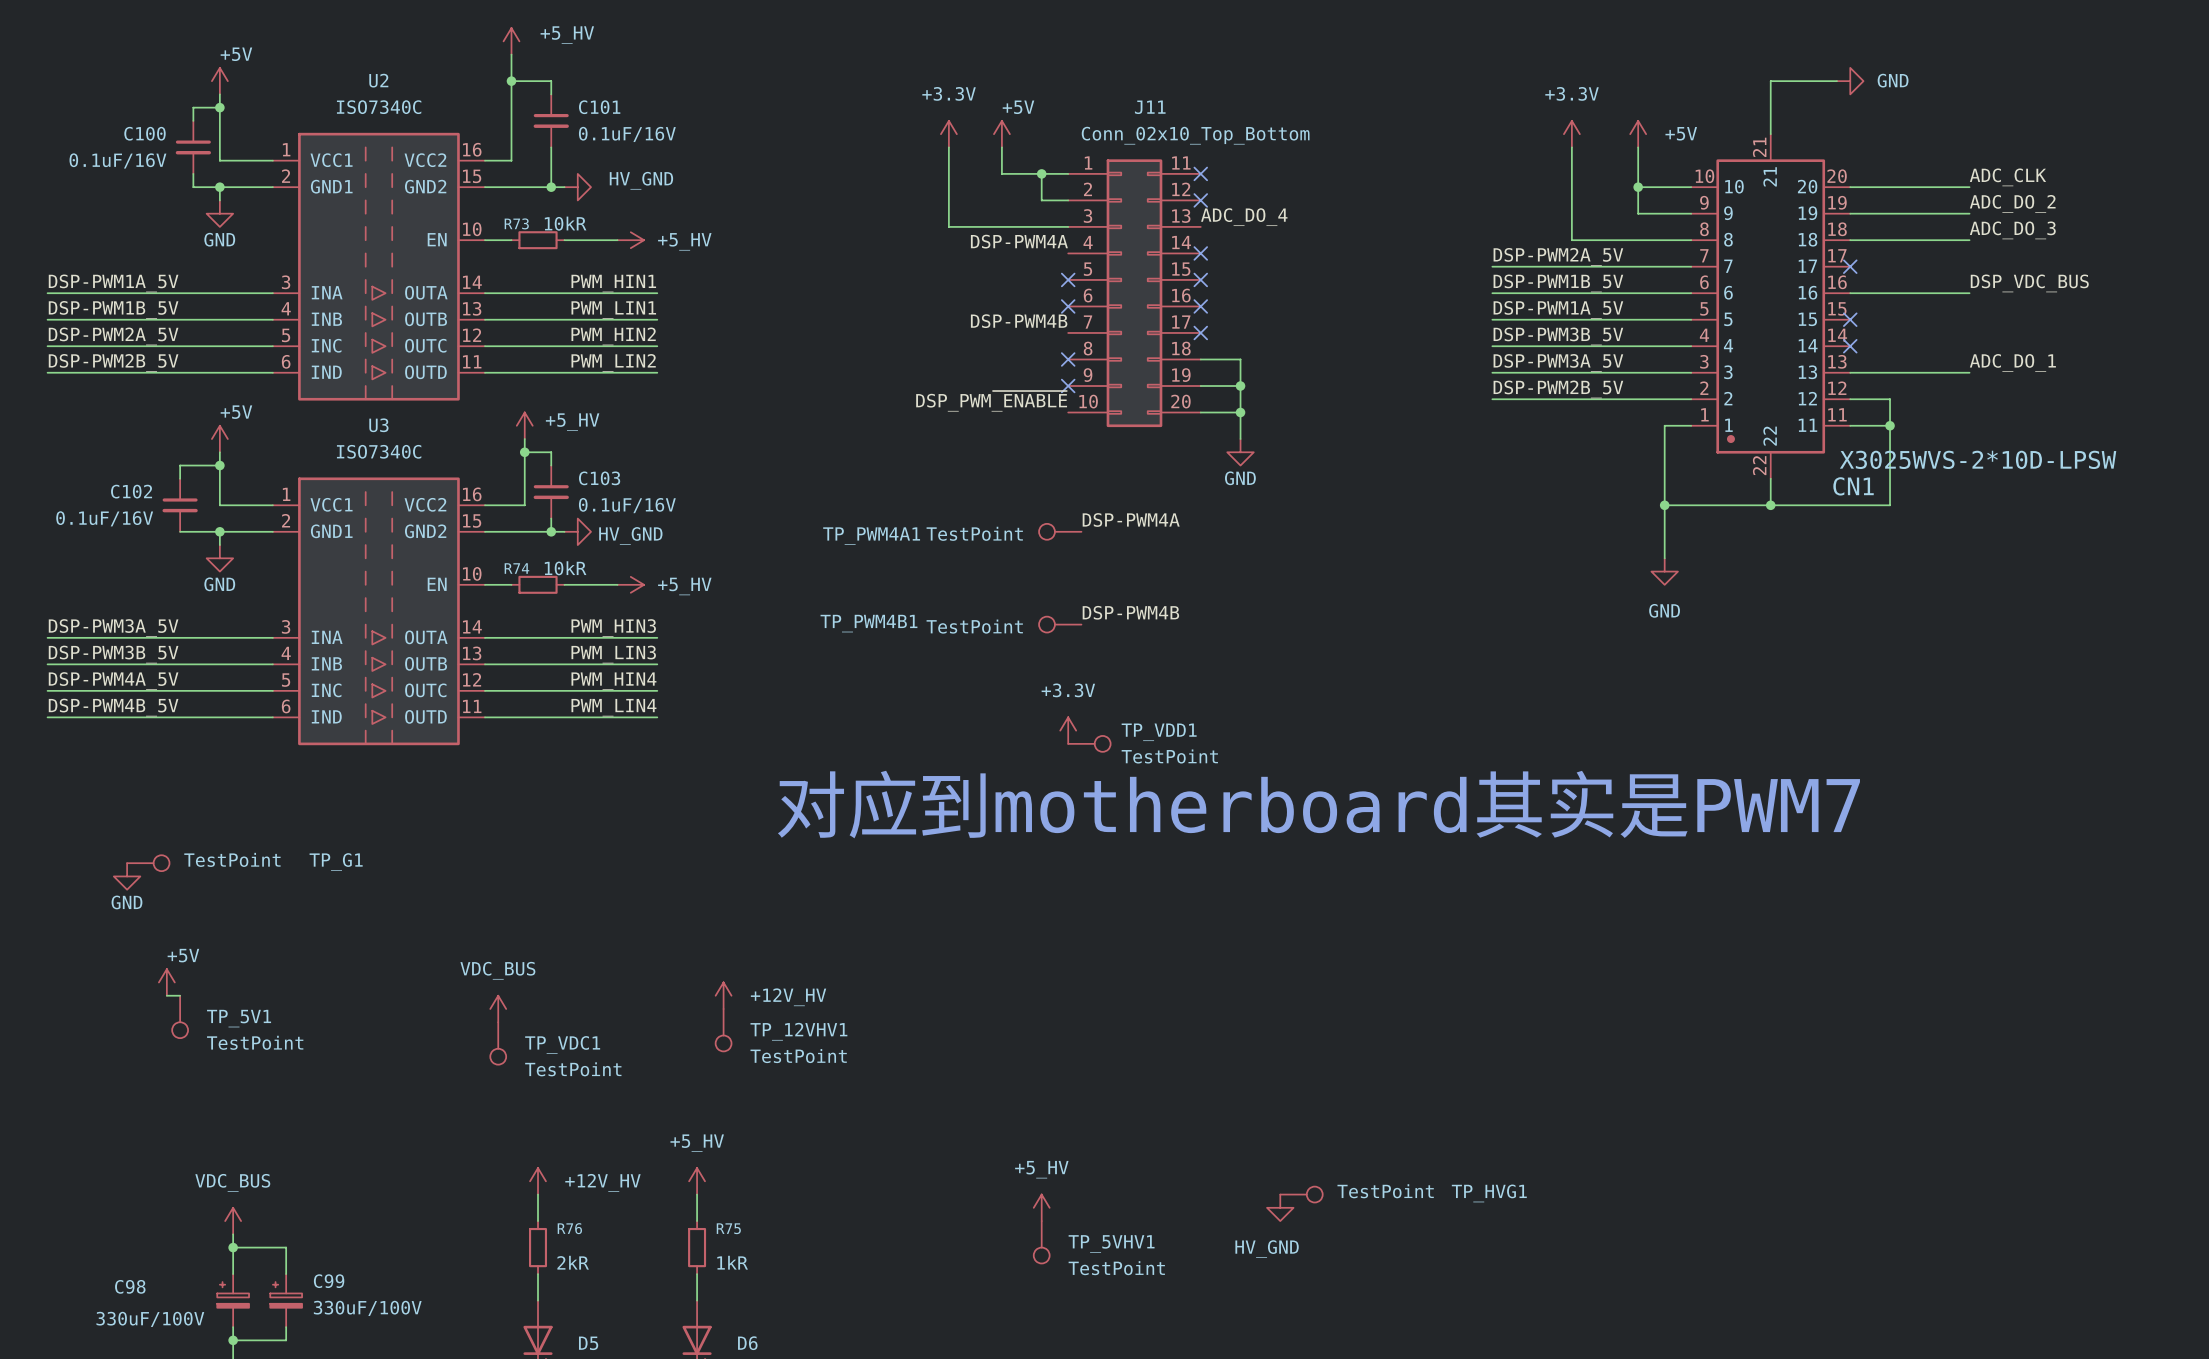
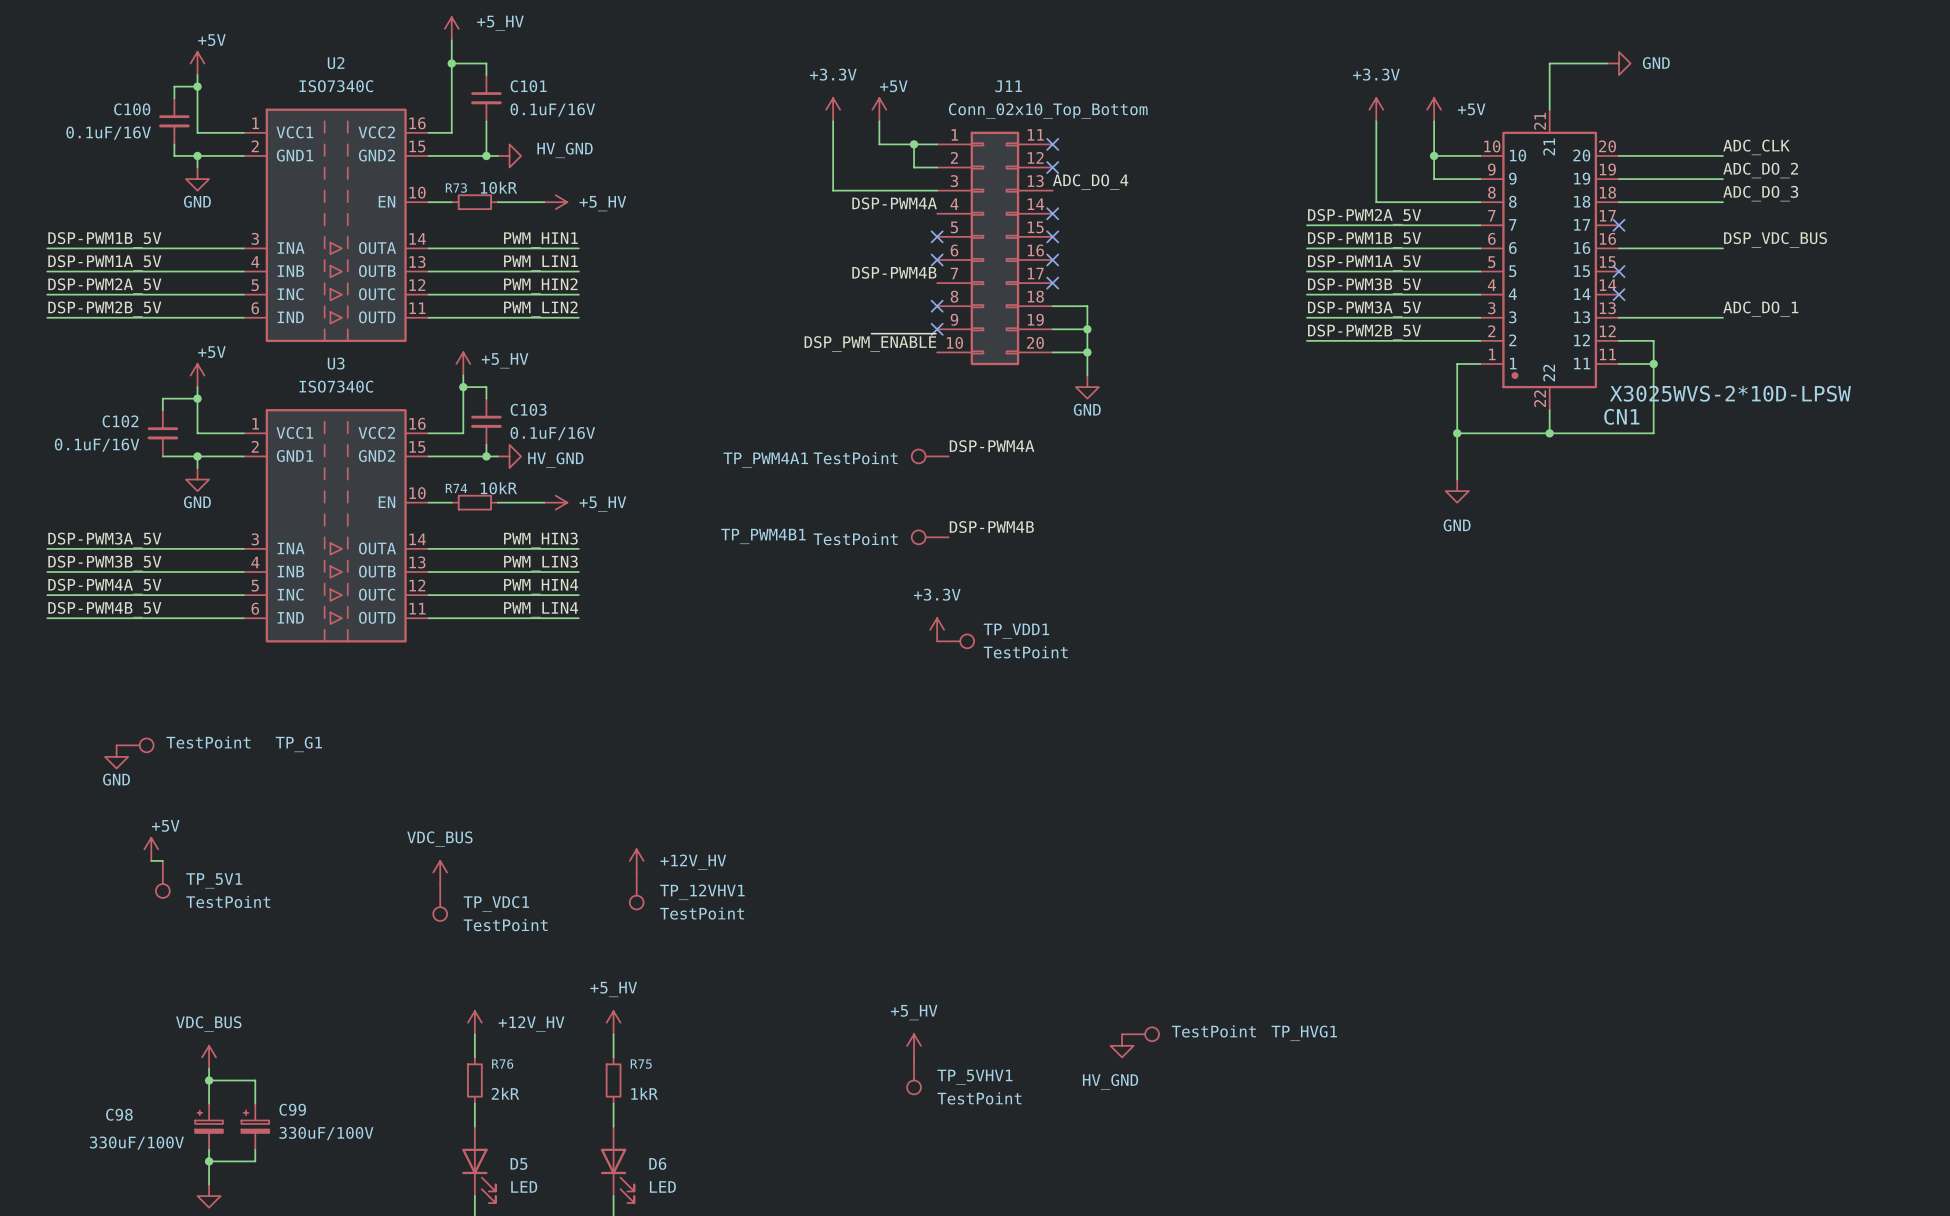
label: DSP-PWM1A_5V (113, 283) -> DSP-PWM1B_5V (104, 239)
label: DSP-PWM1B_5V (113, 309) -> DSP-PWM1A_5V (104, 262)
text: 对应到motherboard其实是PWM7 (1318, 804) -> none

